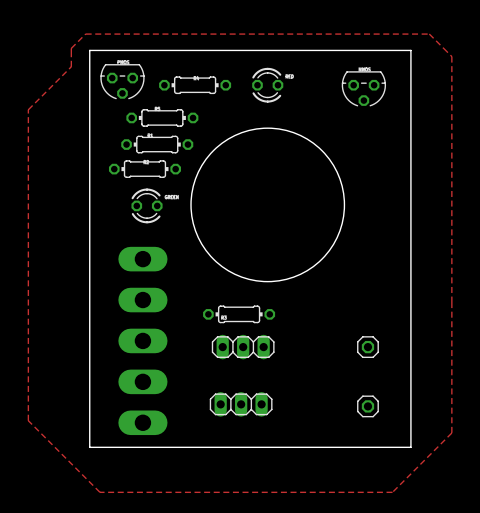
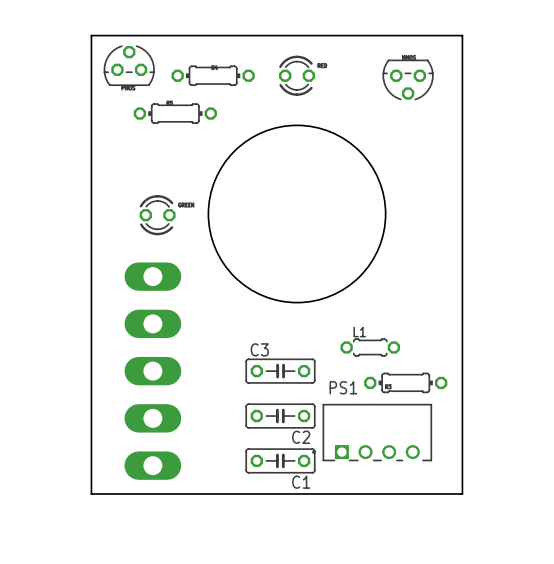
zone outline: (85, 34) (71, 48) (71, 66) (28, 109) (28, 420) (99, 492) (392, 492) (451, 433) (451, 56) (429, 34) (85, 34) -> none
part rotation: 0° (122, 81) -> 180° (129, 65)
part: (157, 144) -> none
part: (144, 169) -> none
part position: (239, 314) -> (405, 382)
L1: none -> (370, 347)
C3: none -> (280, 371)
part: (243, 347) -> none
part: (367, 347) -> none
C2: none -> (280, 416)
PS1: none -> (372, 432)
part: (241, 404) -> none
part: (367, 406) -> none
C1: none -> (280, 460)

